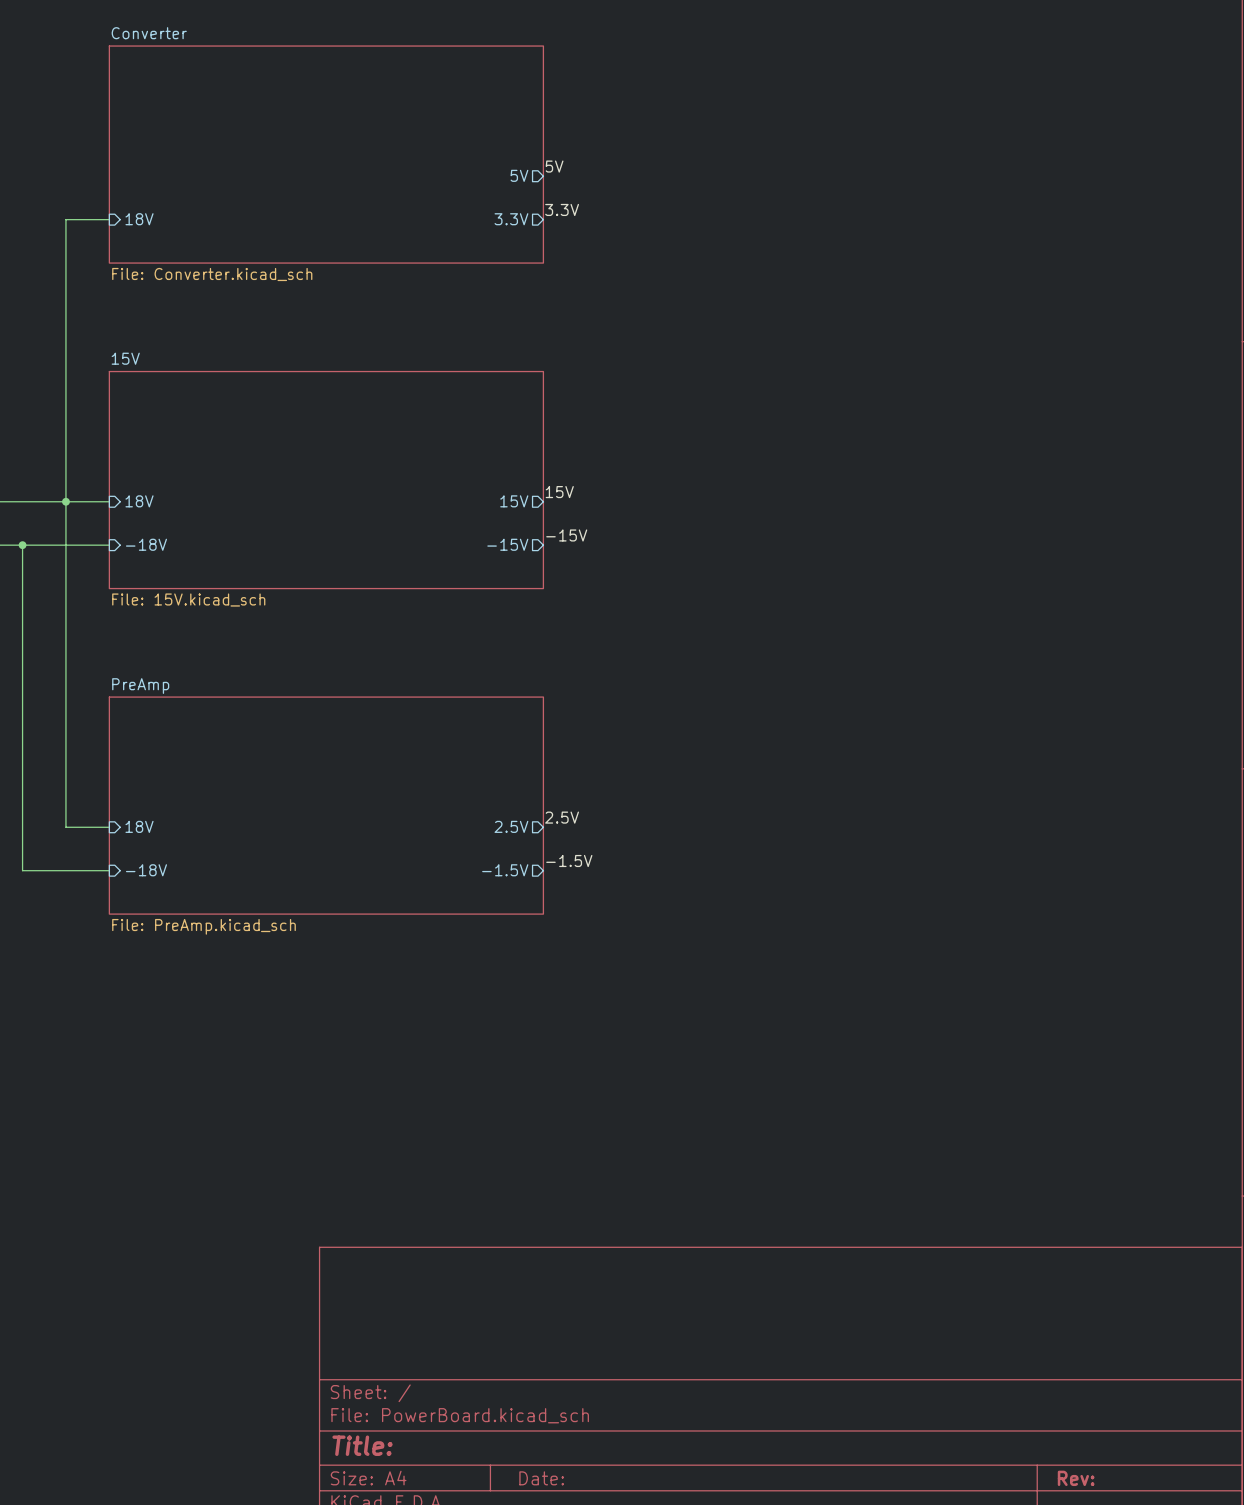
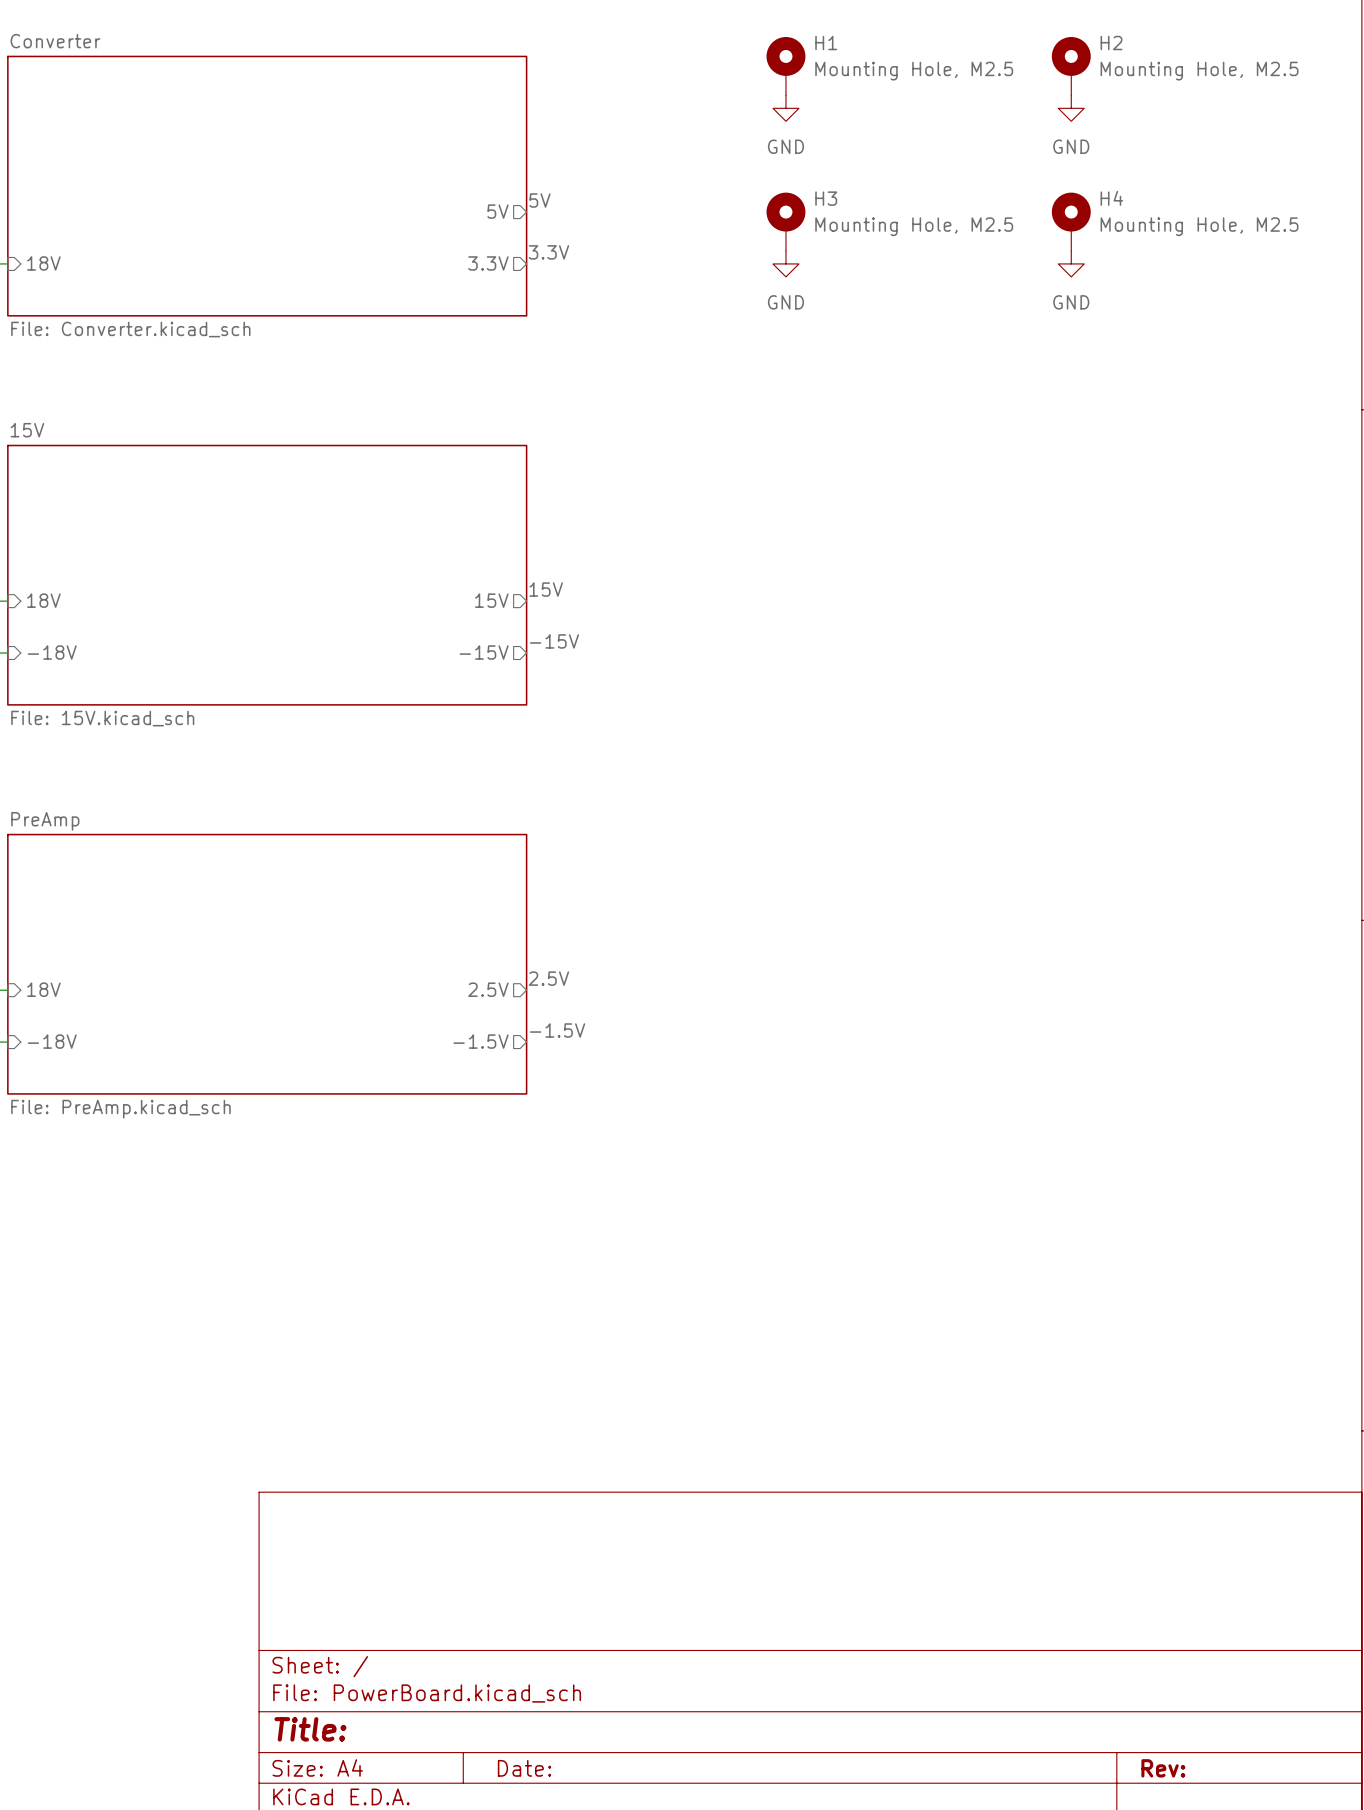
H1: none -> Mounting Hole, M2.5 (785, 66)
H2: none -> Mounting Hole, M2.5 (1071, 66)
power symbol: none -> GND (785, 108)
power symbol: none -> GND (1071, 108)
H3: none -> Mounting Hole, M2.5 (785, 221)
H4: none -> Mounting Hole, M2.5 (1071, 221)
power symbol: none -> GND (785, 263)
power symbol: none -> GND (1071, 263)

